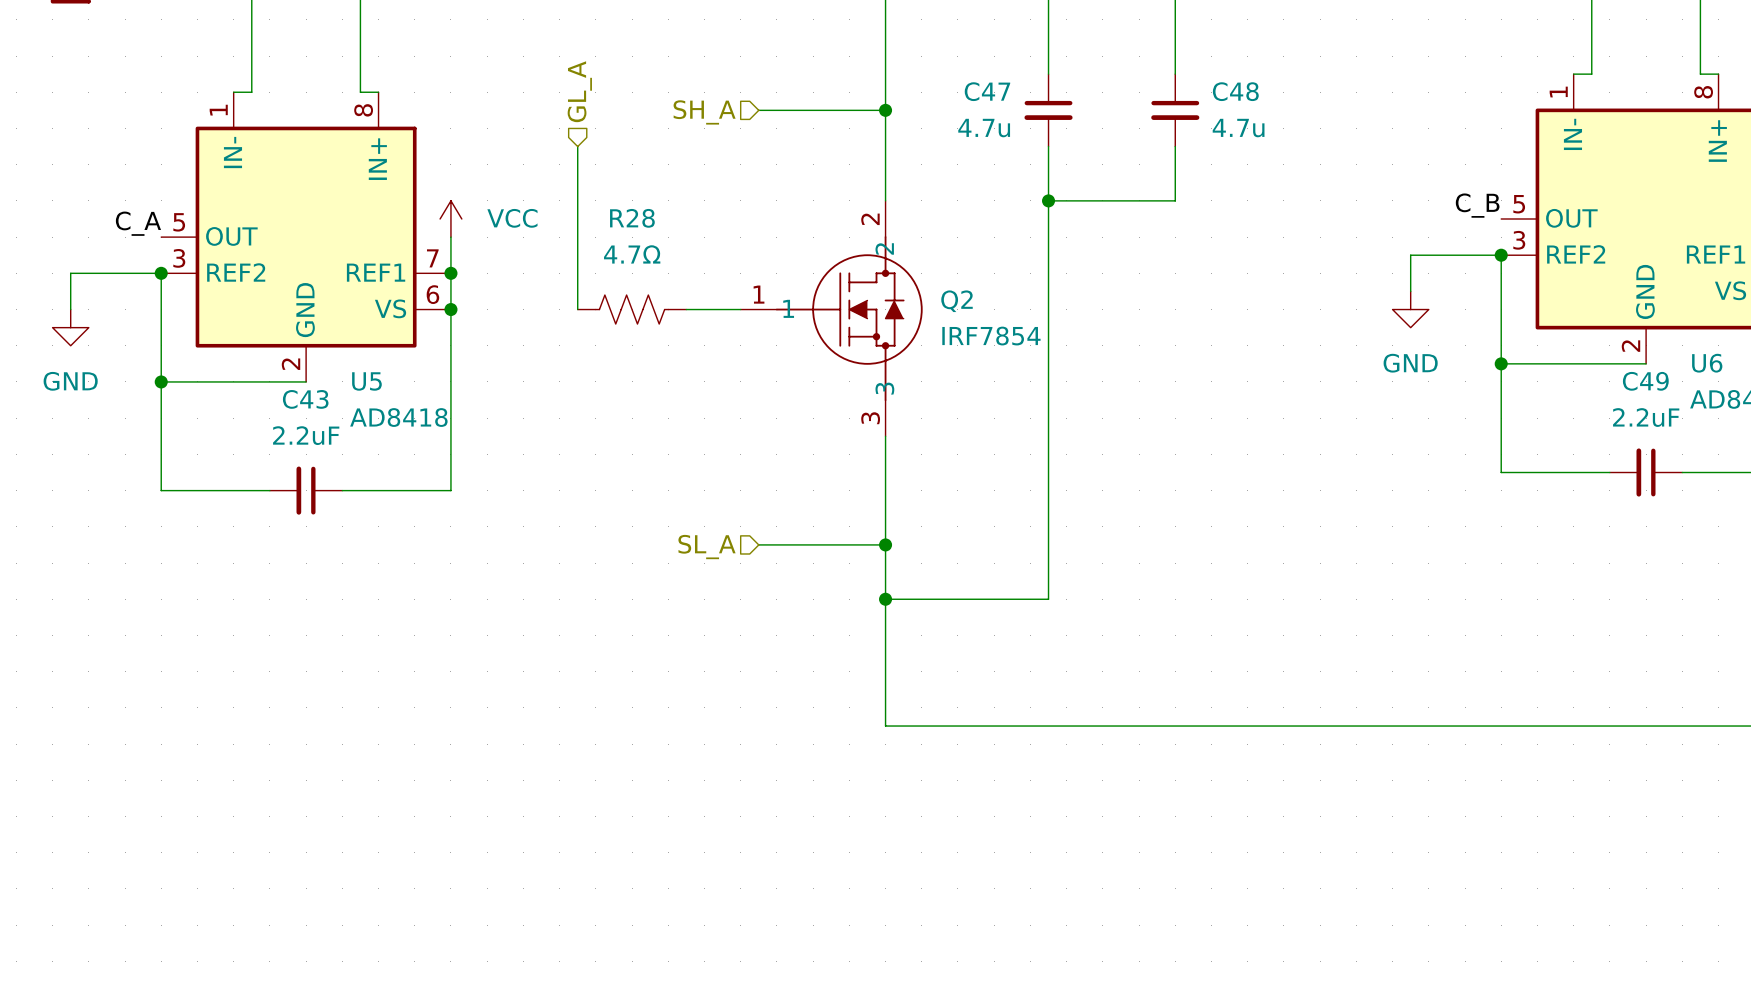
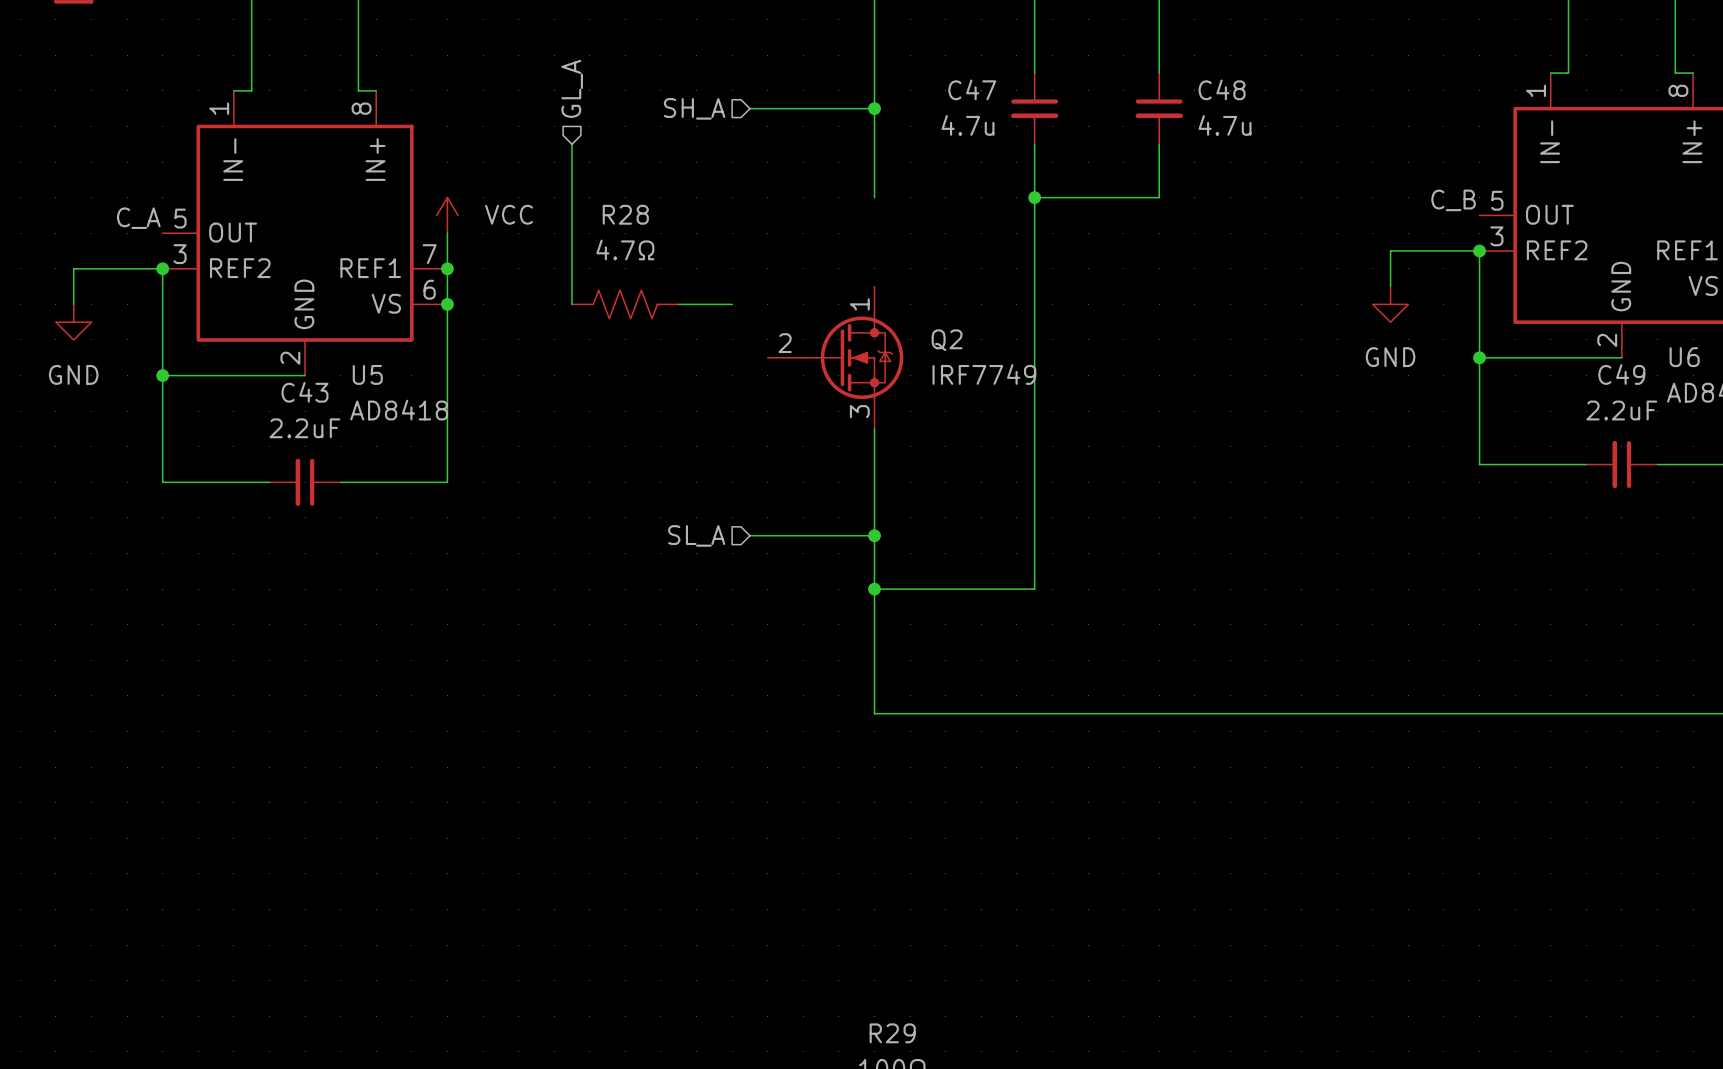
Q2 symbol: [740, 200, 923, 437] -> [767, 286, 904, 429]
Q2 value: IRF7854 (991, 336) -> IRF7749 (984, 374)

